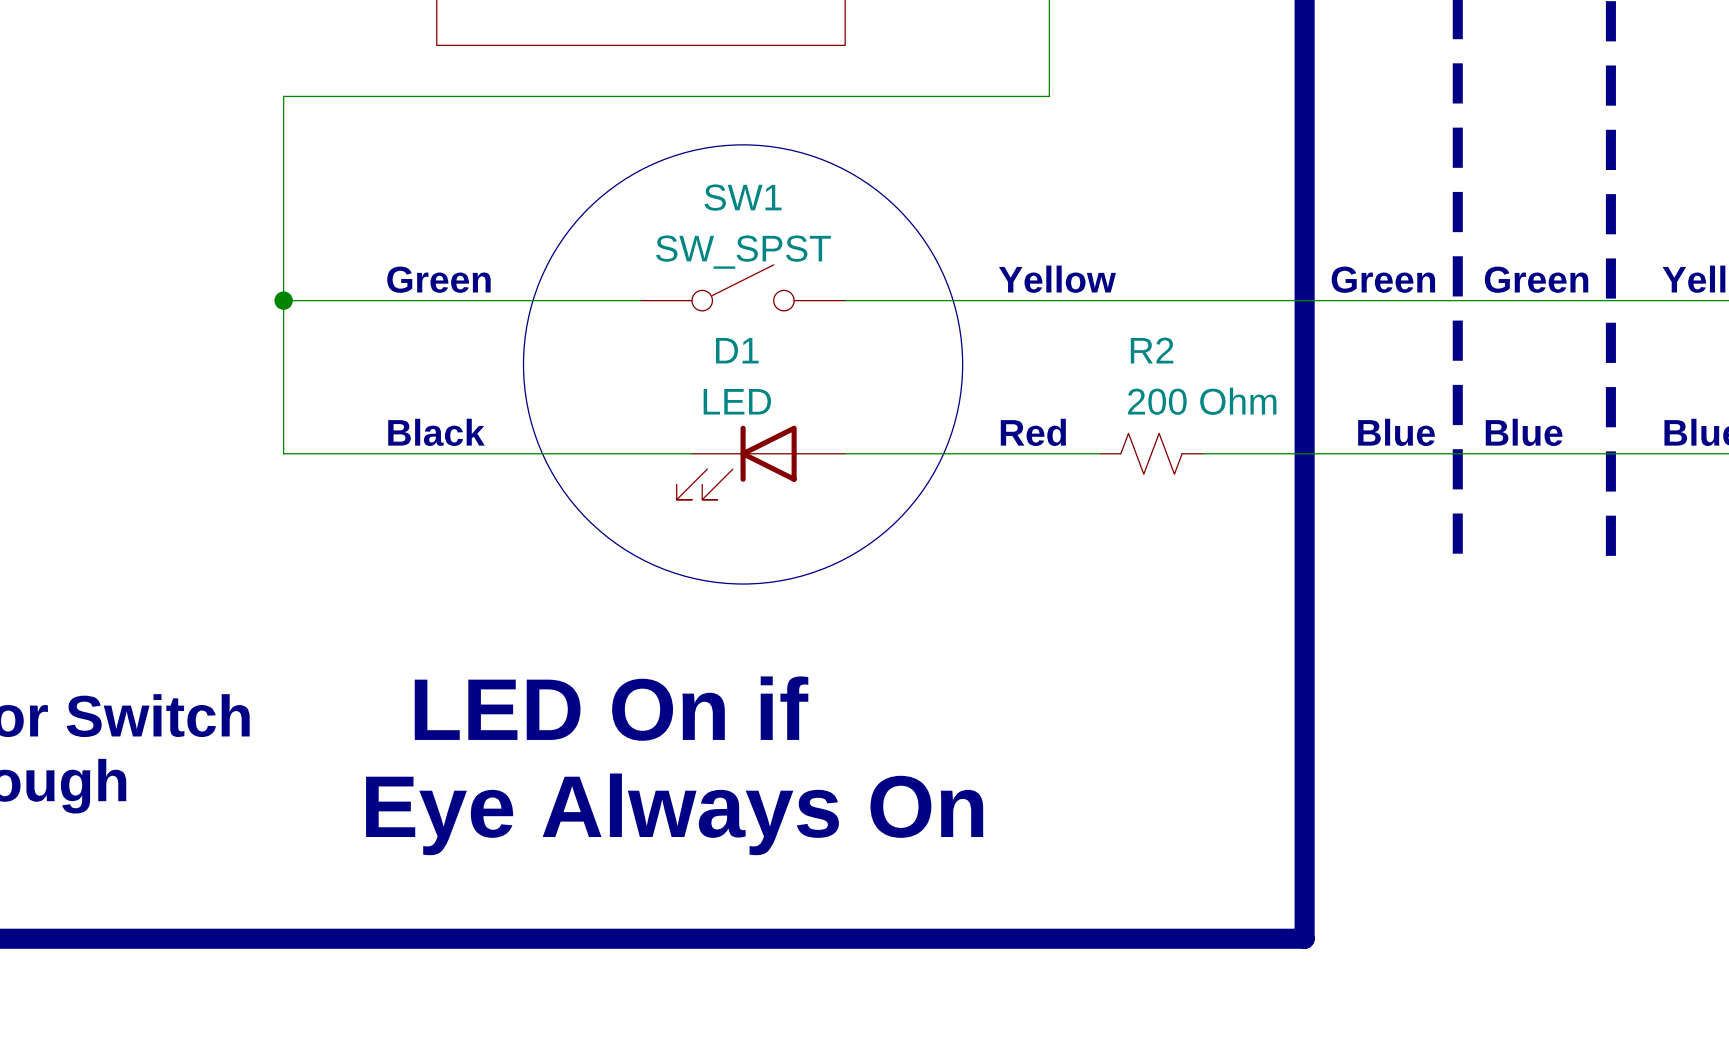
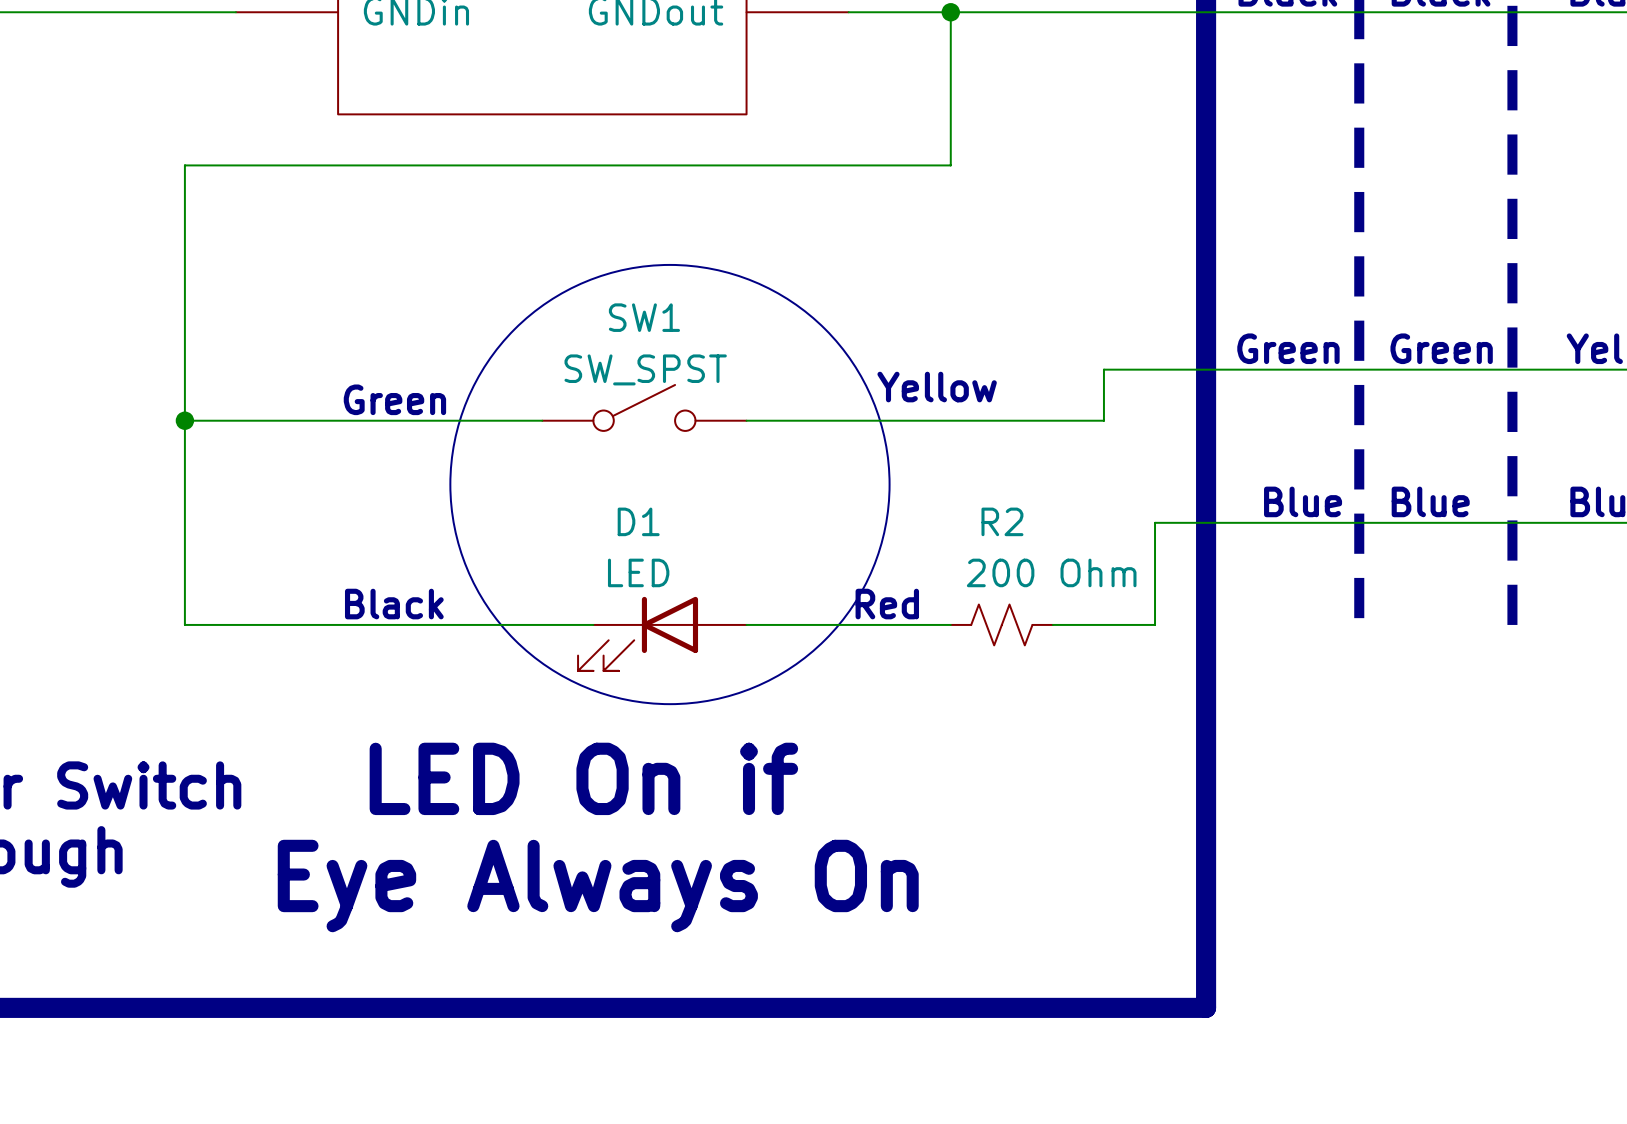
text position: Green (438, 279) -> Green (394, 399)
text position: Yellow (1057, 279) -> Yellow (937, 387)
SW1 position: (743, 287) -> (644, 407)
wire: (283, 300) (640, 300) -> (184, 420) (542, 420)
junction position: (283, 300) -> (184, 420)
wire: (845, 300) (1202, 300) -> (746, 420) (1103, 420) (1103, 369)
drawing position: (743, 364) -> (669, 484)
text position: Black (436, 432) -> Black (394, 604)
text position: Red (1033, 432) -> Red (887, 604)
wire: (283, 453) (692, 453) -> (184, 522) (184, 624) (593, 624)
wire: (845, 453) (1100, 453) -> none
R2 position: (1151, 453) -> (1001, 624)
wire: (1202, 453) (1253, 453) -> (1052, 624) (1155, 624) (1155, 522)
D1 position: (760, 462) -> (662, 633)
wire: none -> (746, 624) (950, 624)

